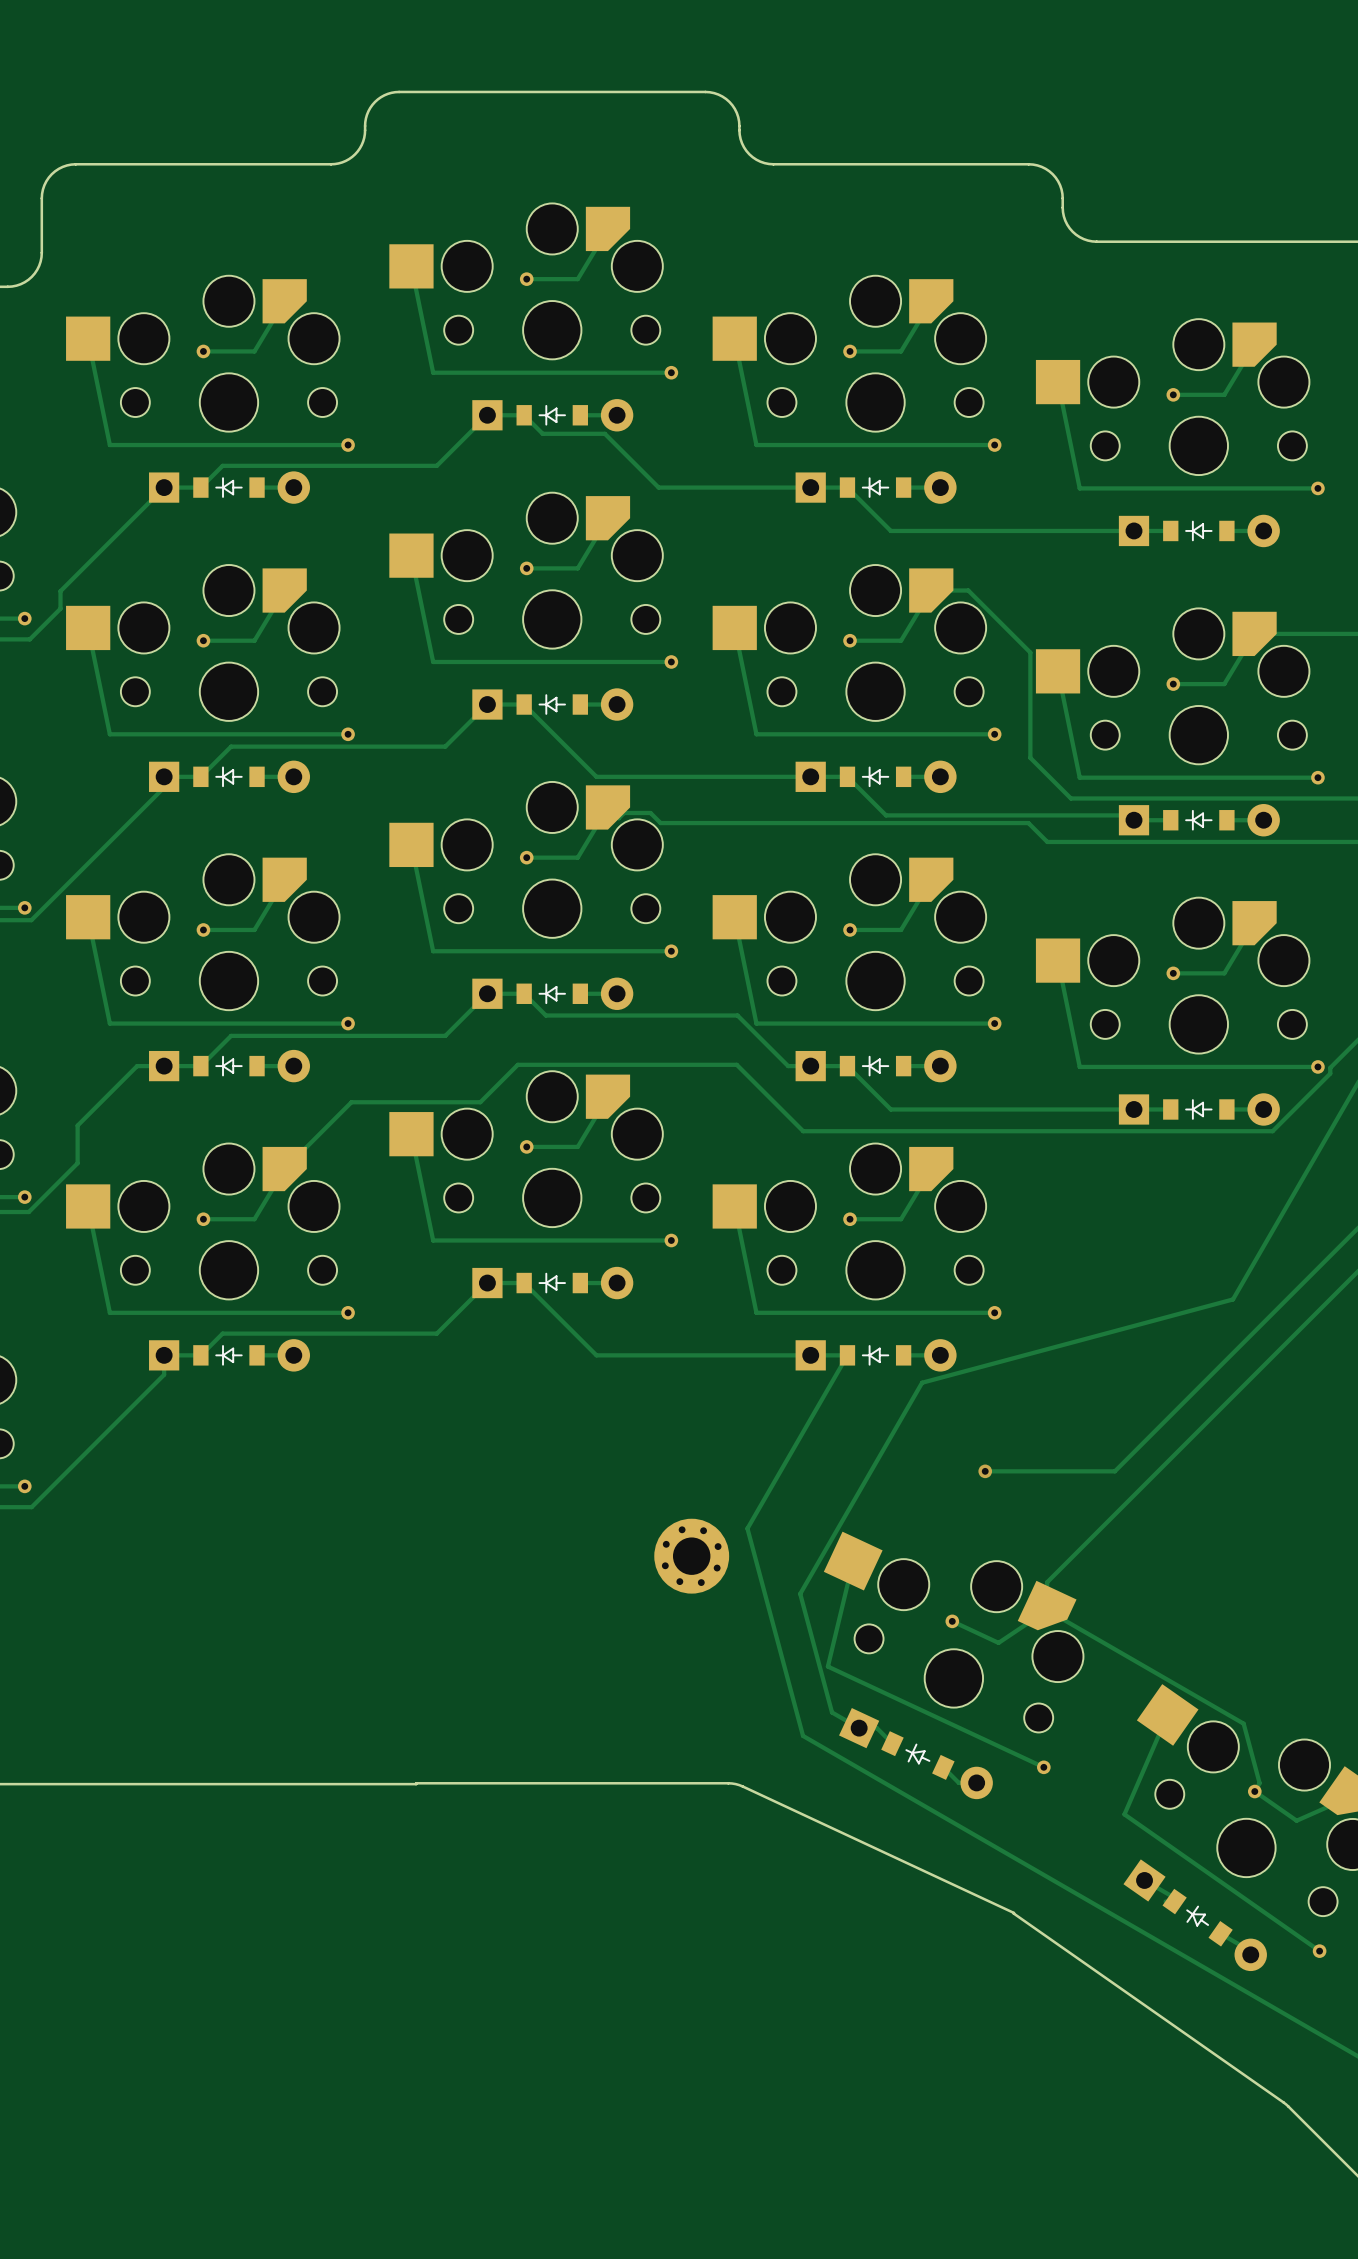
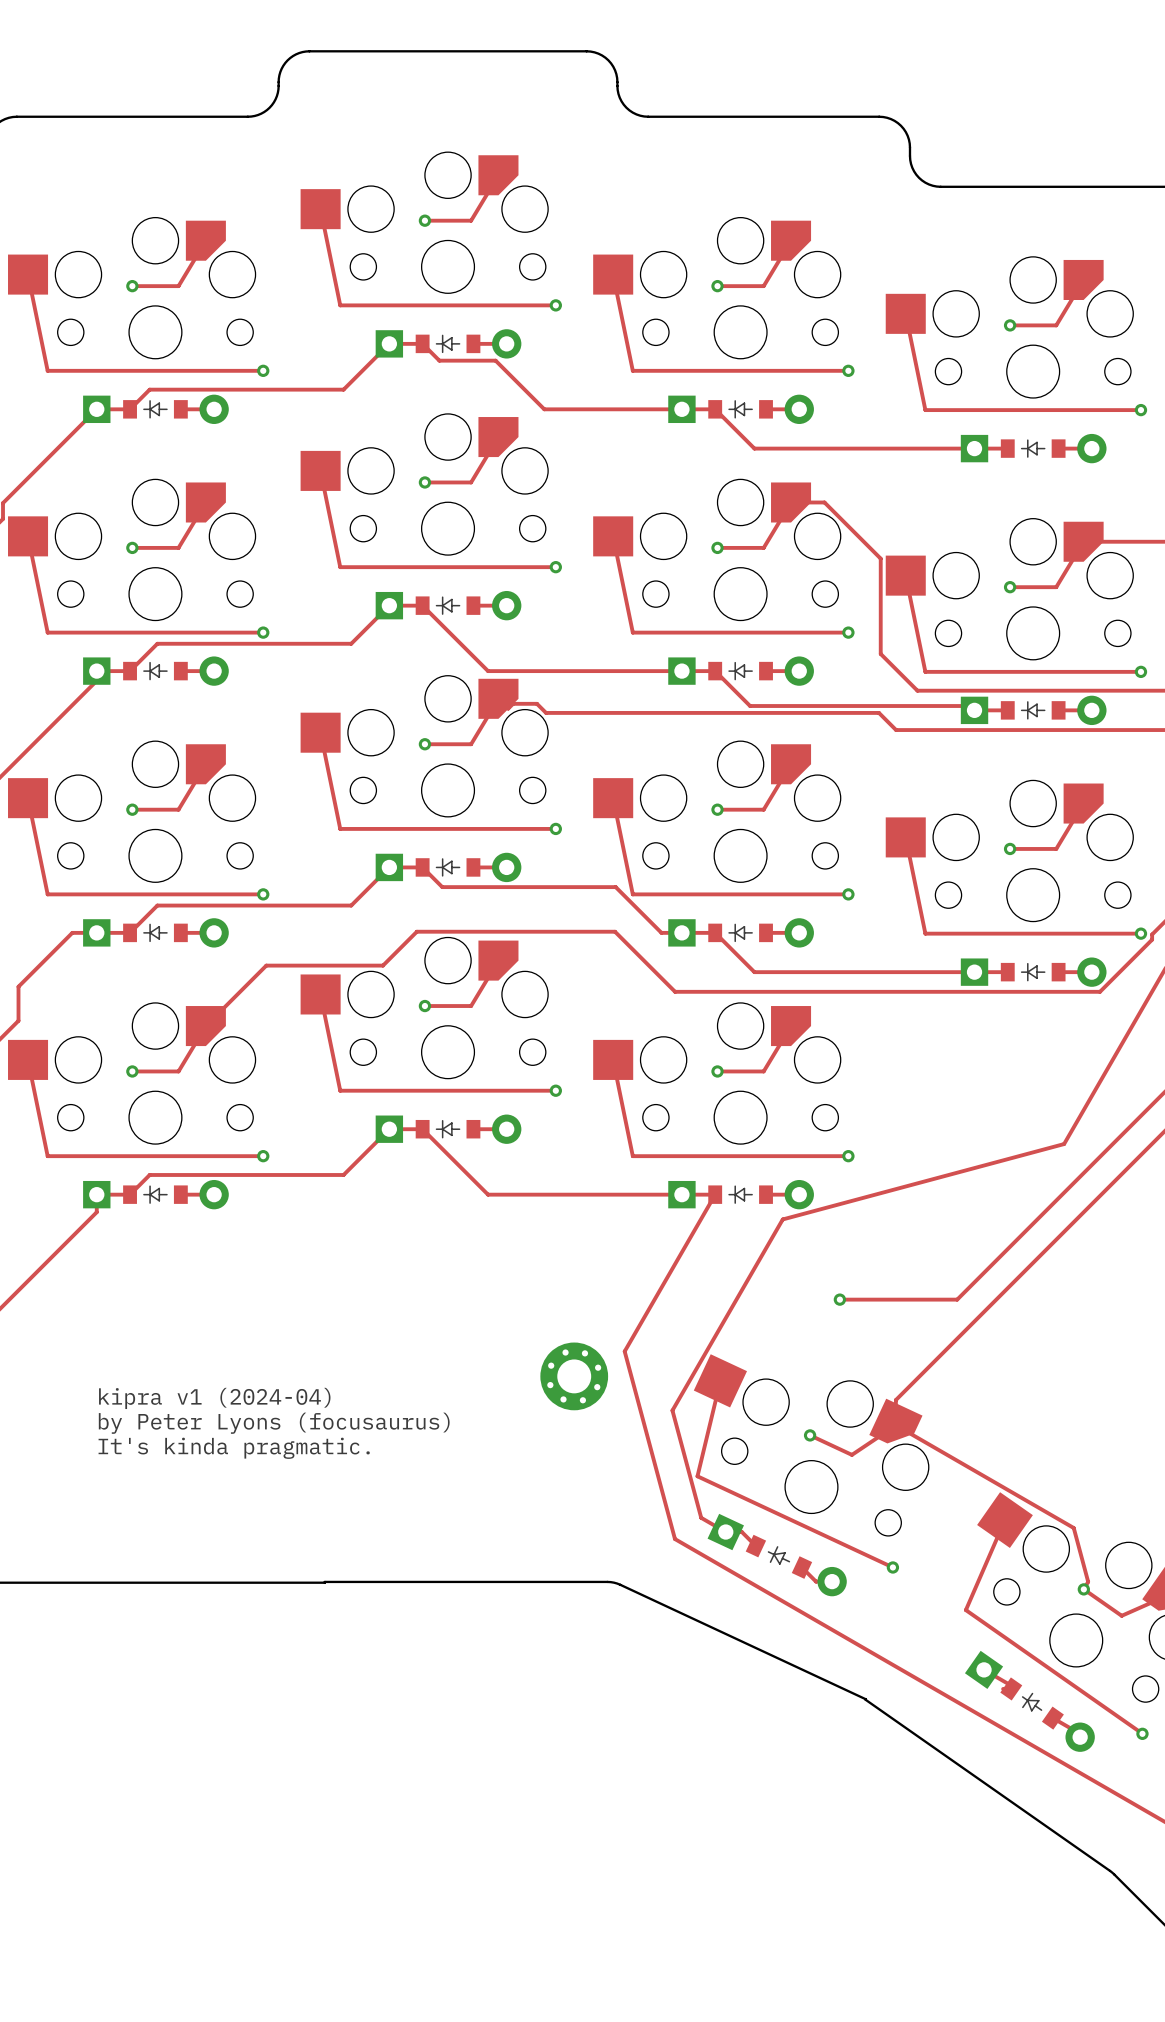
text: none -> kipra v1 (2024-04) (214, 1398)
text: none -> by Peter Lyons (focusaurus) (274, 1423)
text: none -> It's kinda pragmatic. (234, 1448)

